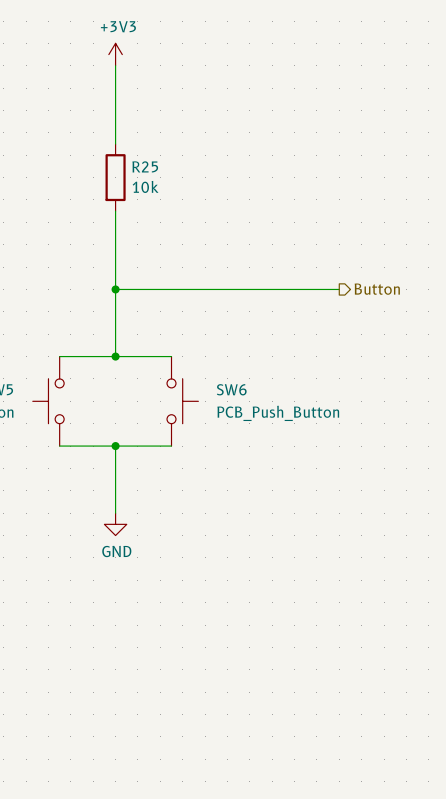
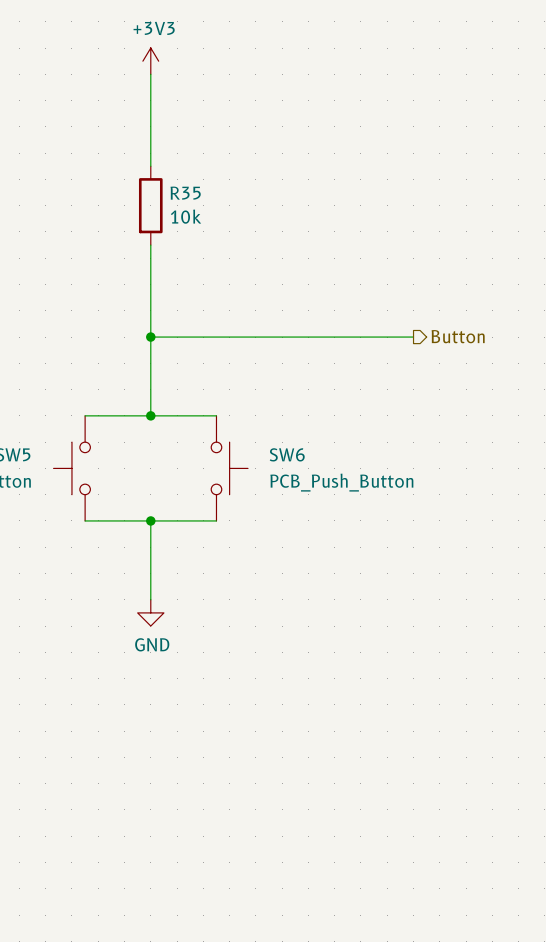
R25 name: R25 (145, 166) -> R35 (185, 193)

